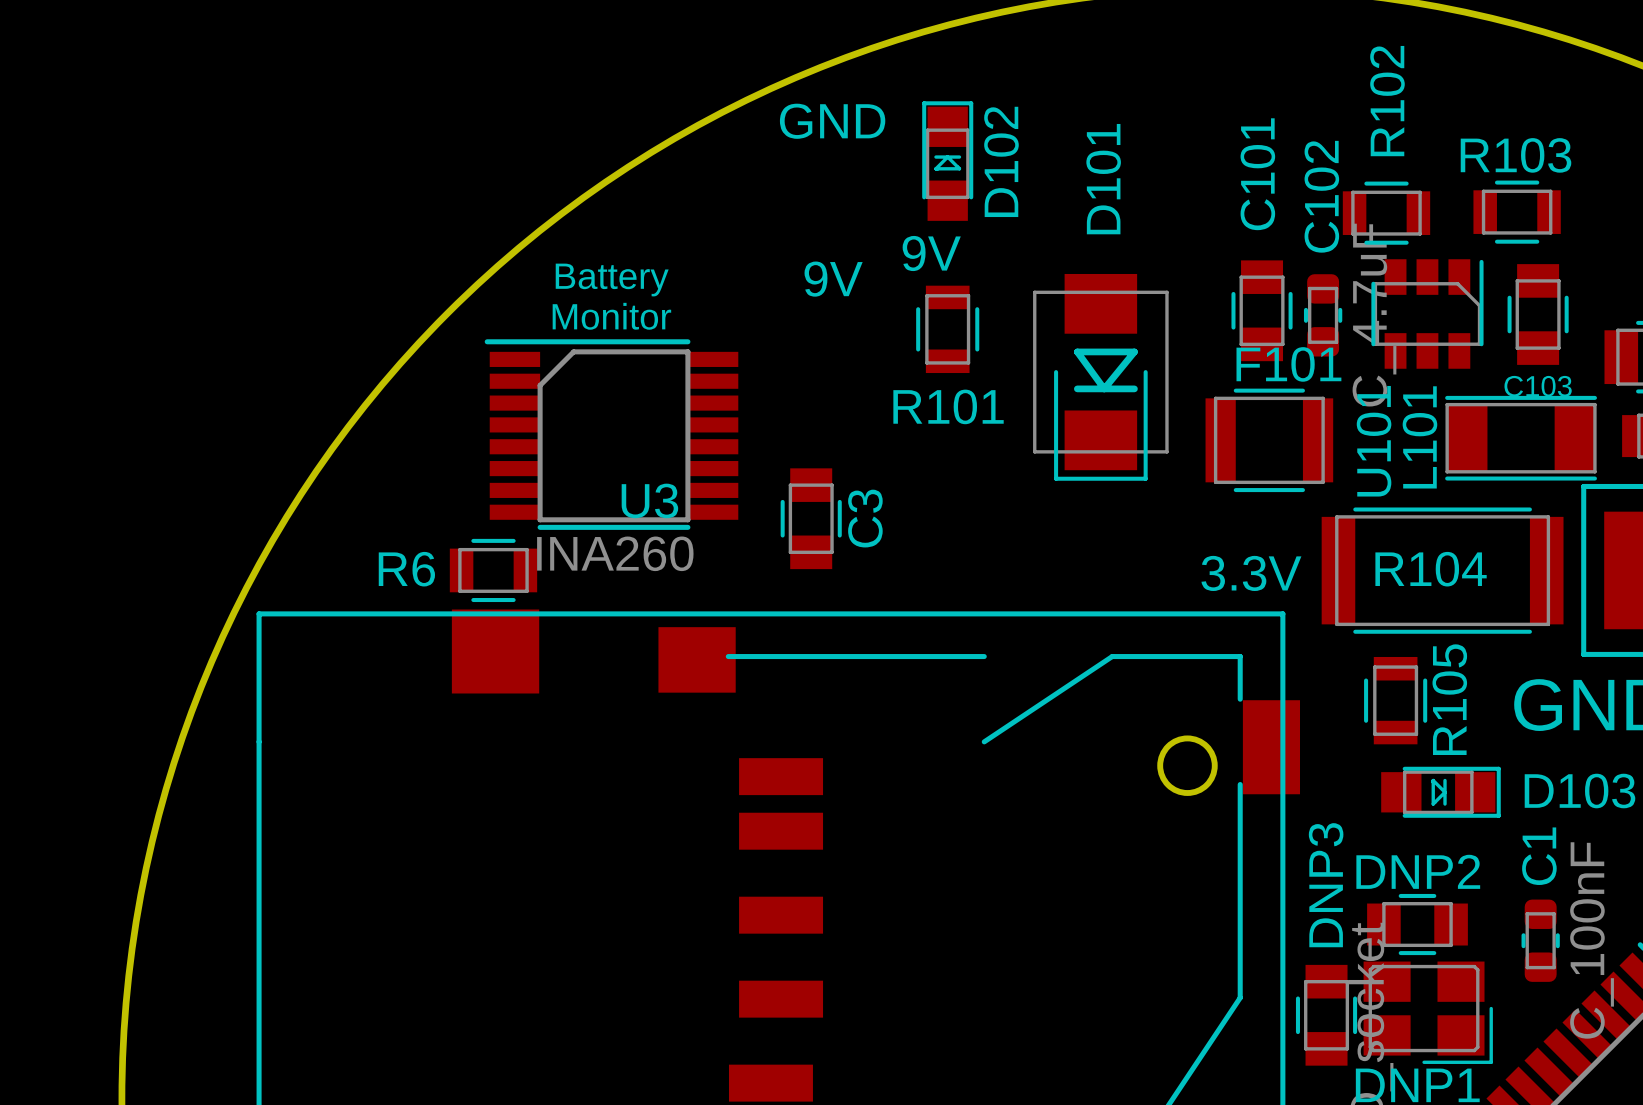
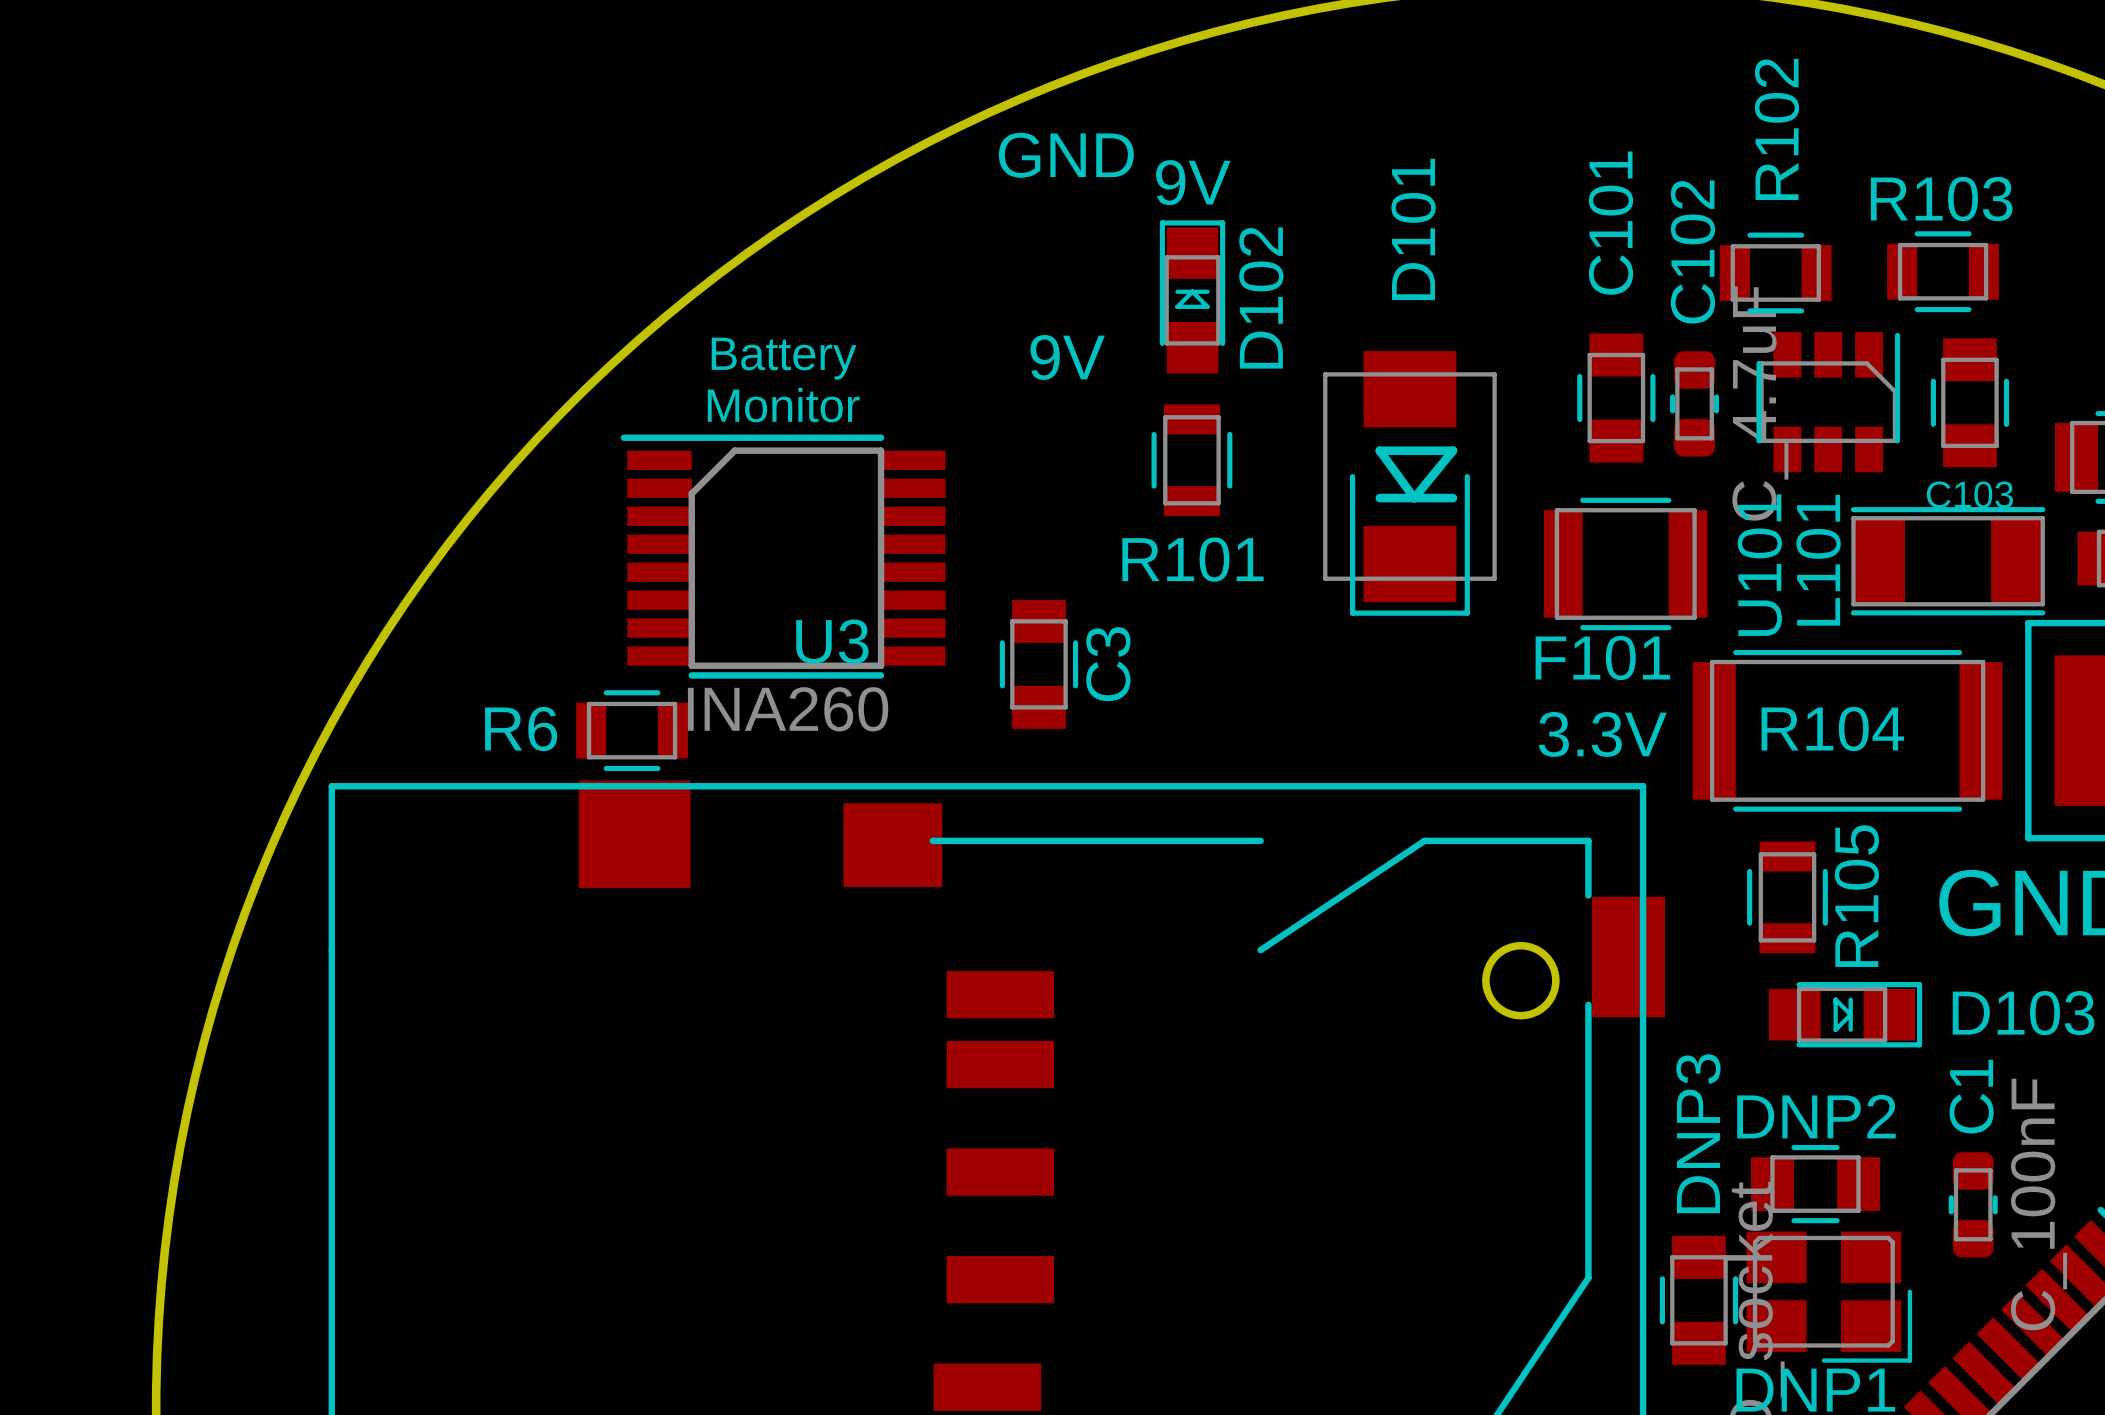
D102 position: (947, 161) -> (1192, 296)
text position: 9V (931, 253) -> 9V (1193, 182)
R101 position: (947, 329) -> (1191, 460)
F101 name position: F101 (1288, 364) -> F101 (1602, 657)

